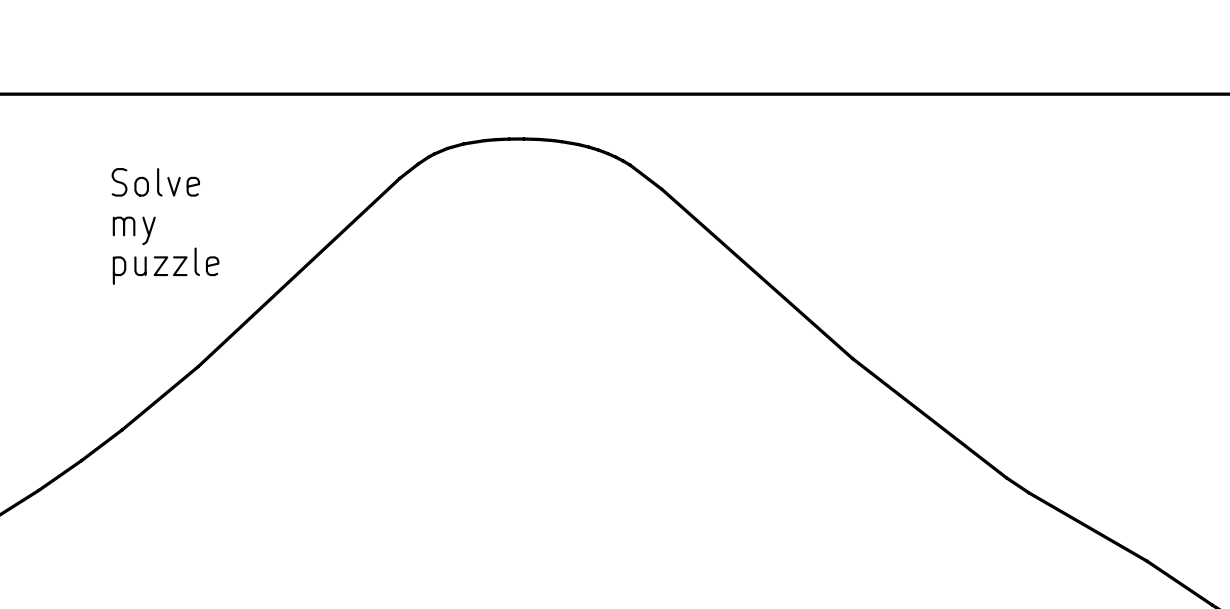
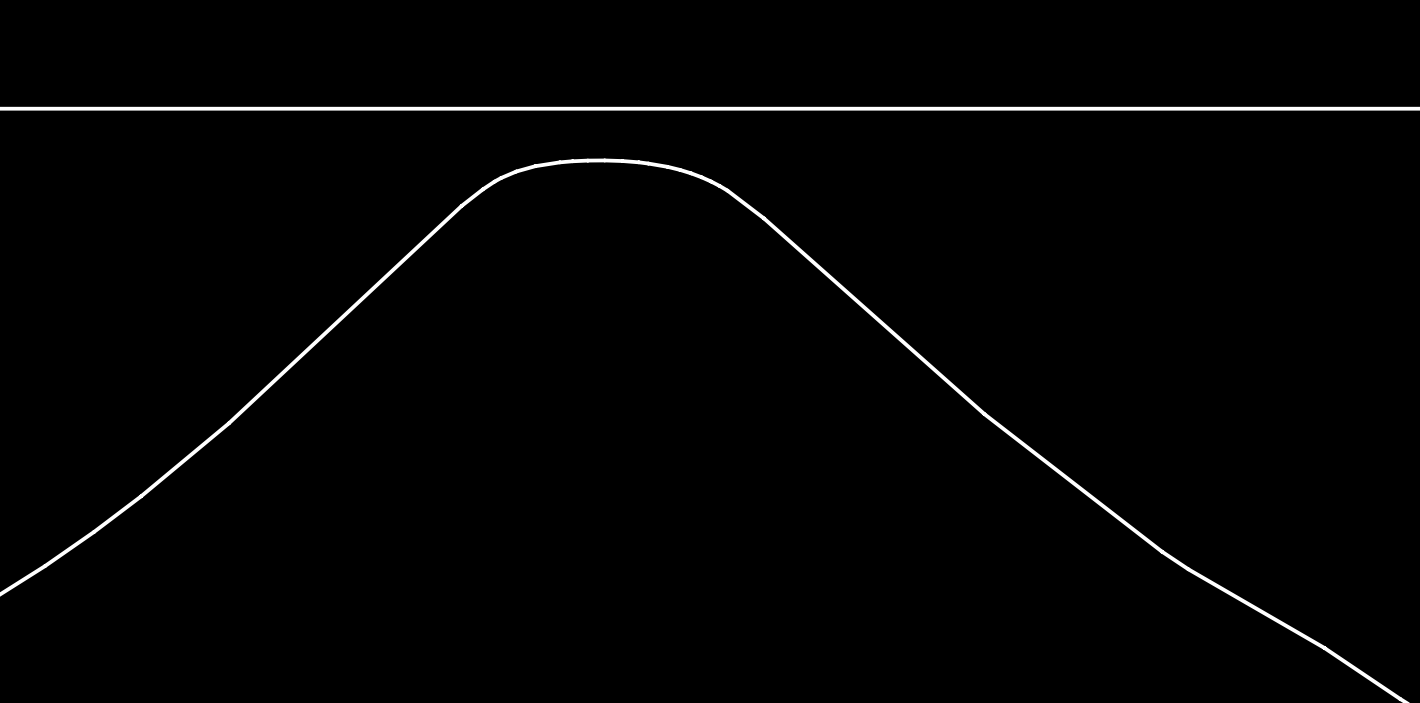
text: Solve (155, 182) -> none
text: my (134, 230) -> none
text: puzzle (166, 266) -> none

